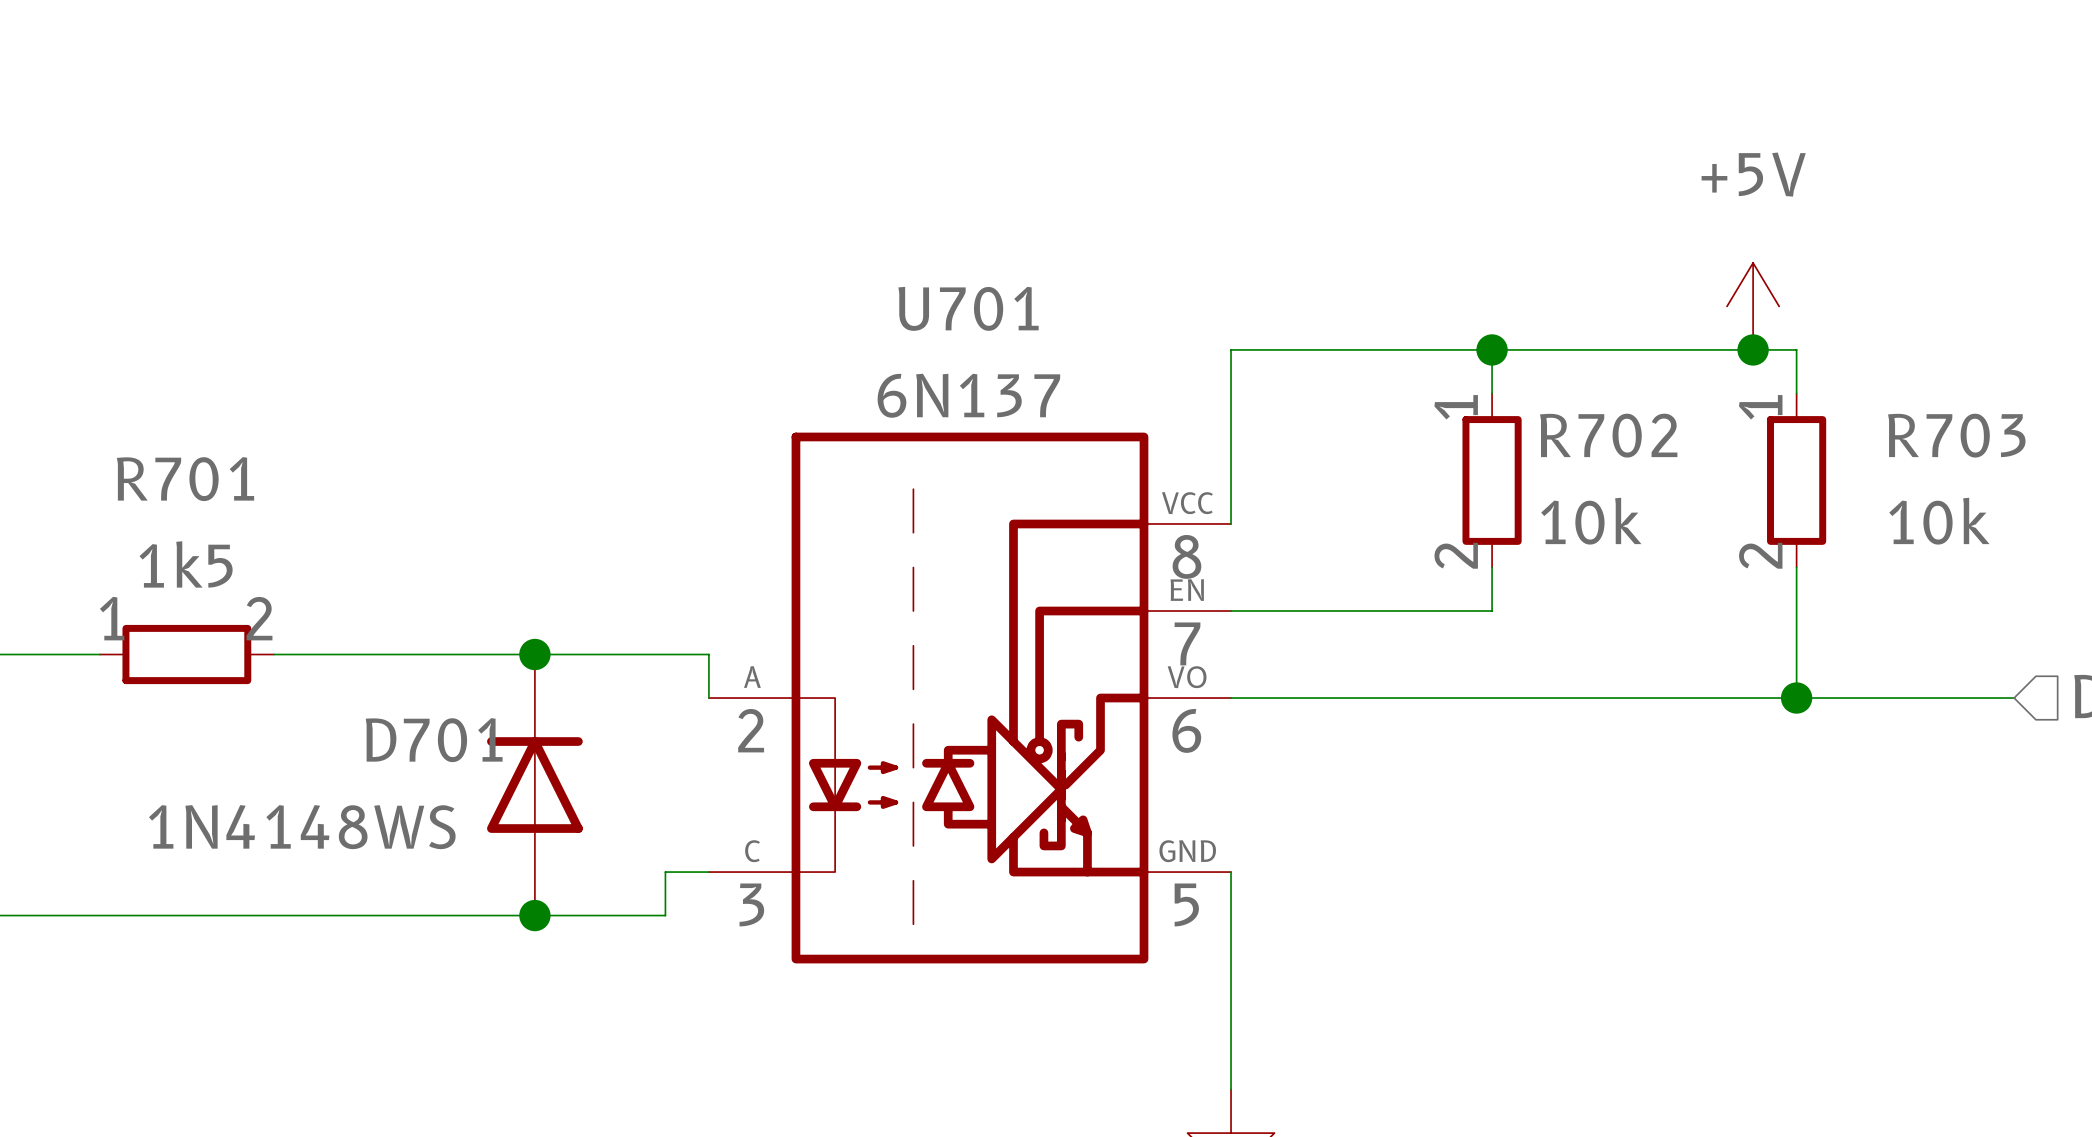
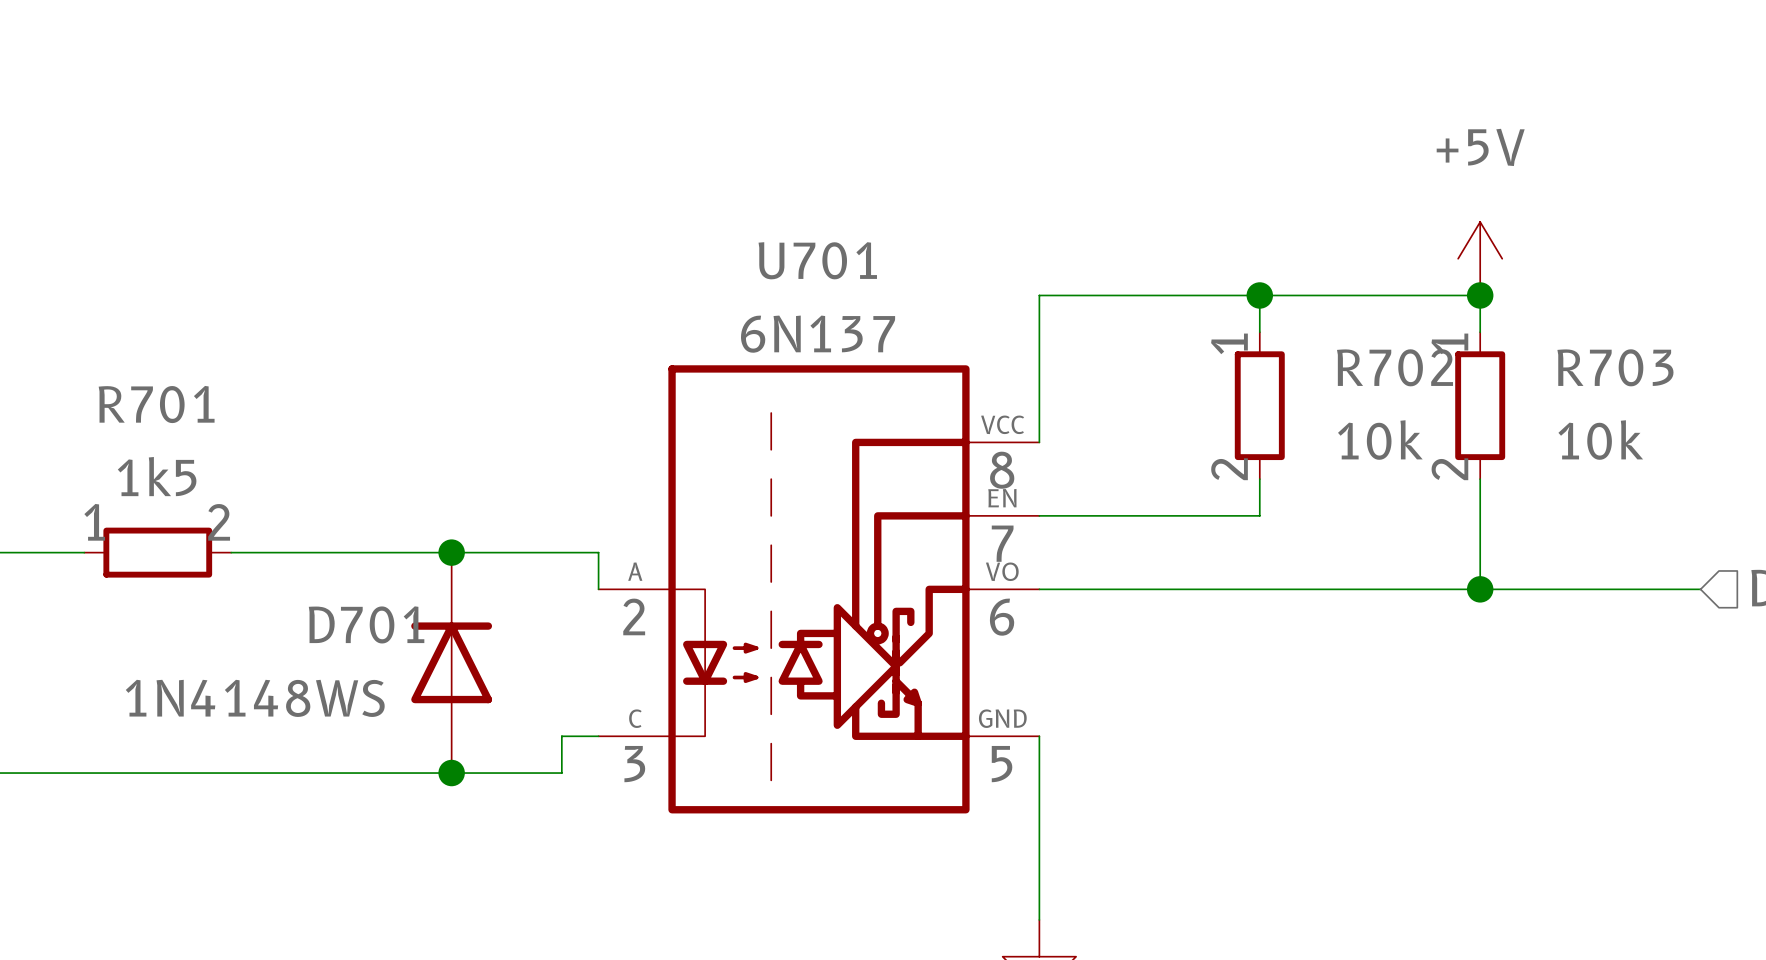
wire: (1753, 349) (1796, 349) (1796, 393) -> (1480, 295) (1480, 332)
R702 name position: R702 (1608, 435) -> R702 (1395, 367)
R703 position: (1796, 480) -> (1480, 405)
R702 value position: 10k (1591, 521) -> 10k (1380, 440)
wire: (1796, 567) (1796, 698) -> (1480, 479) (1480, 589)
junction position: (1796, 698) -> (1480, 589)

